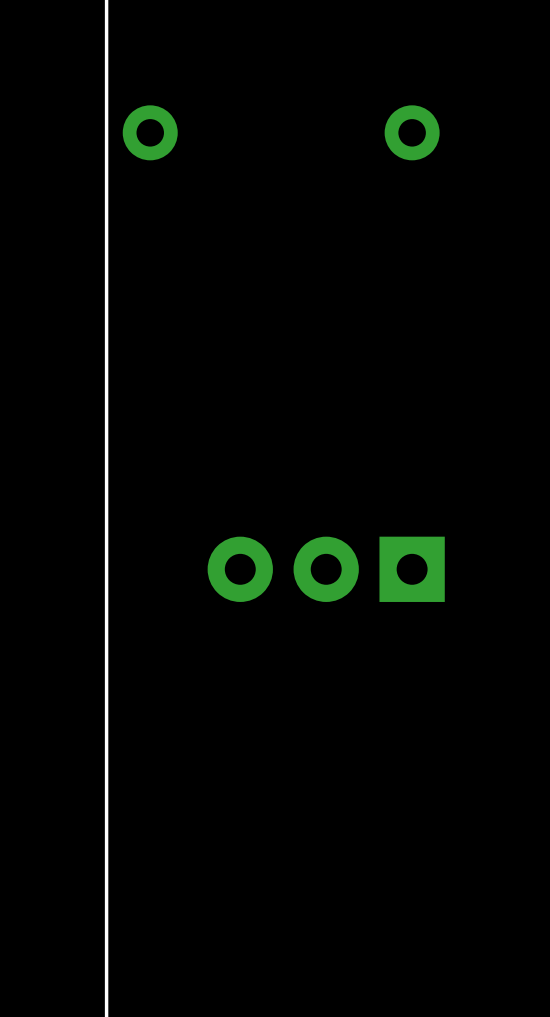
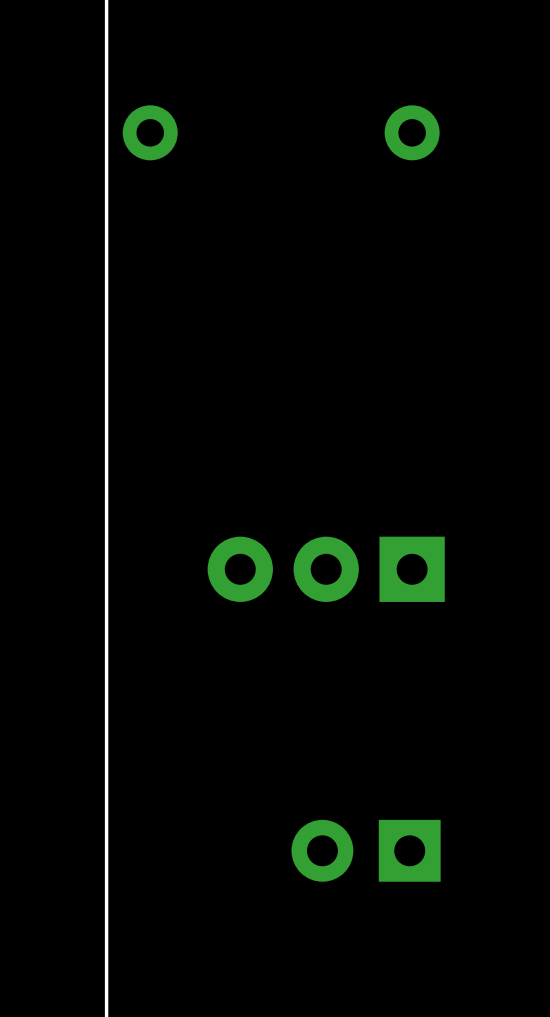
part: none -> (366, 850)

